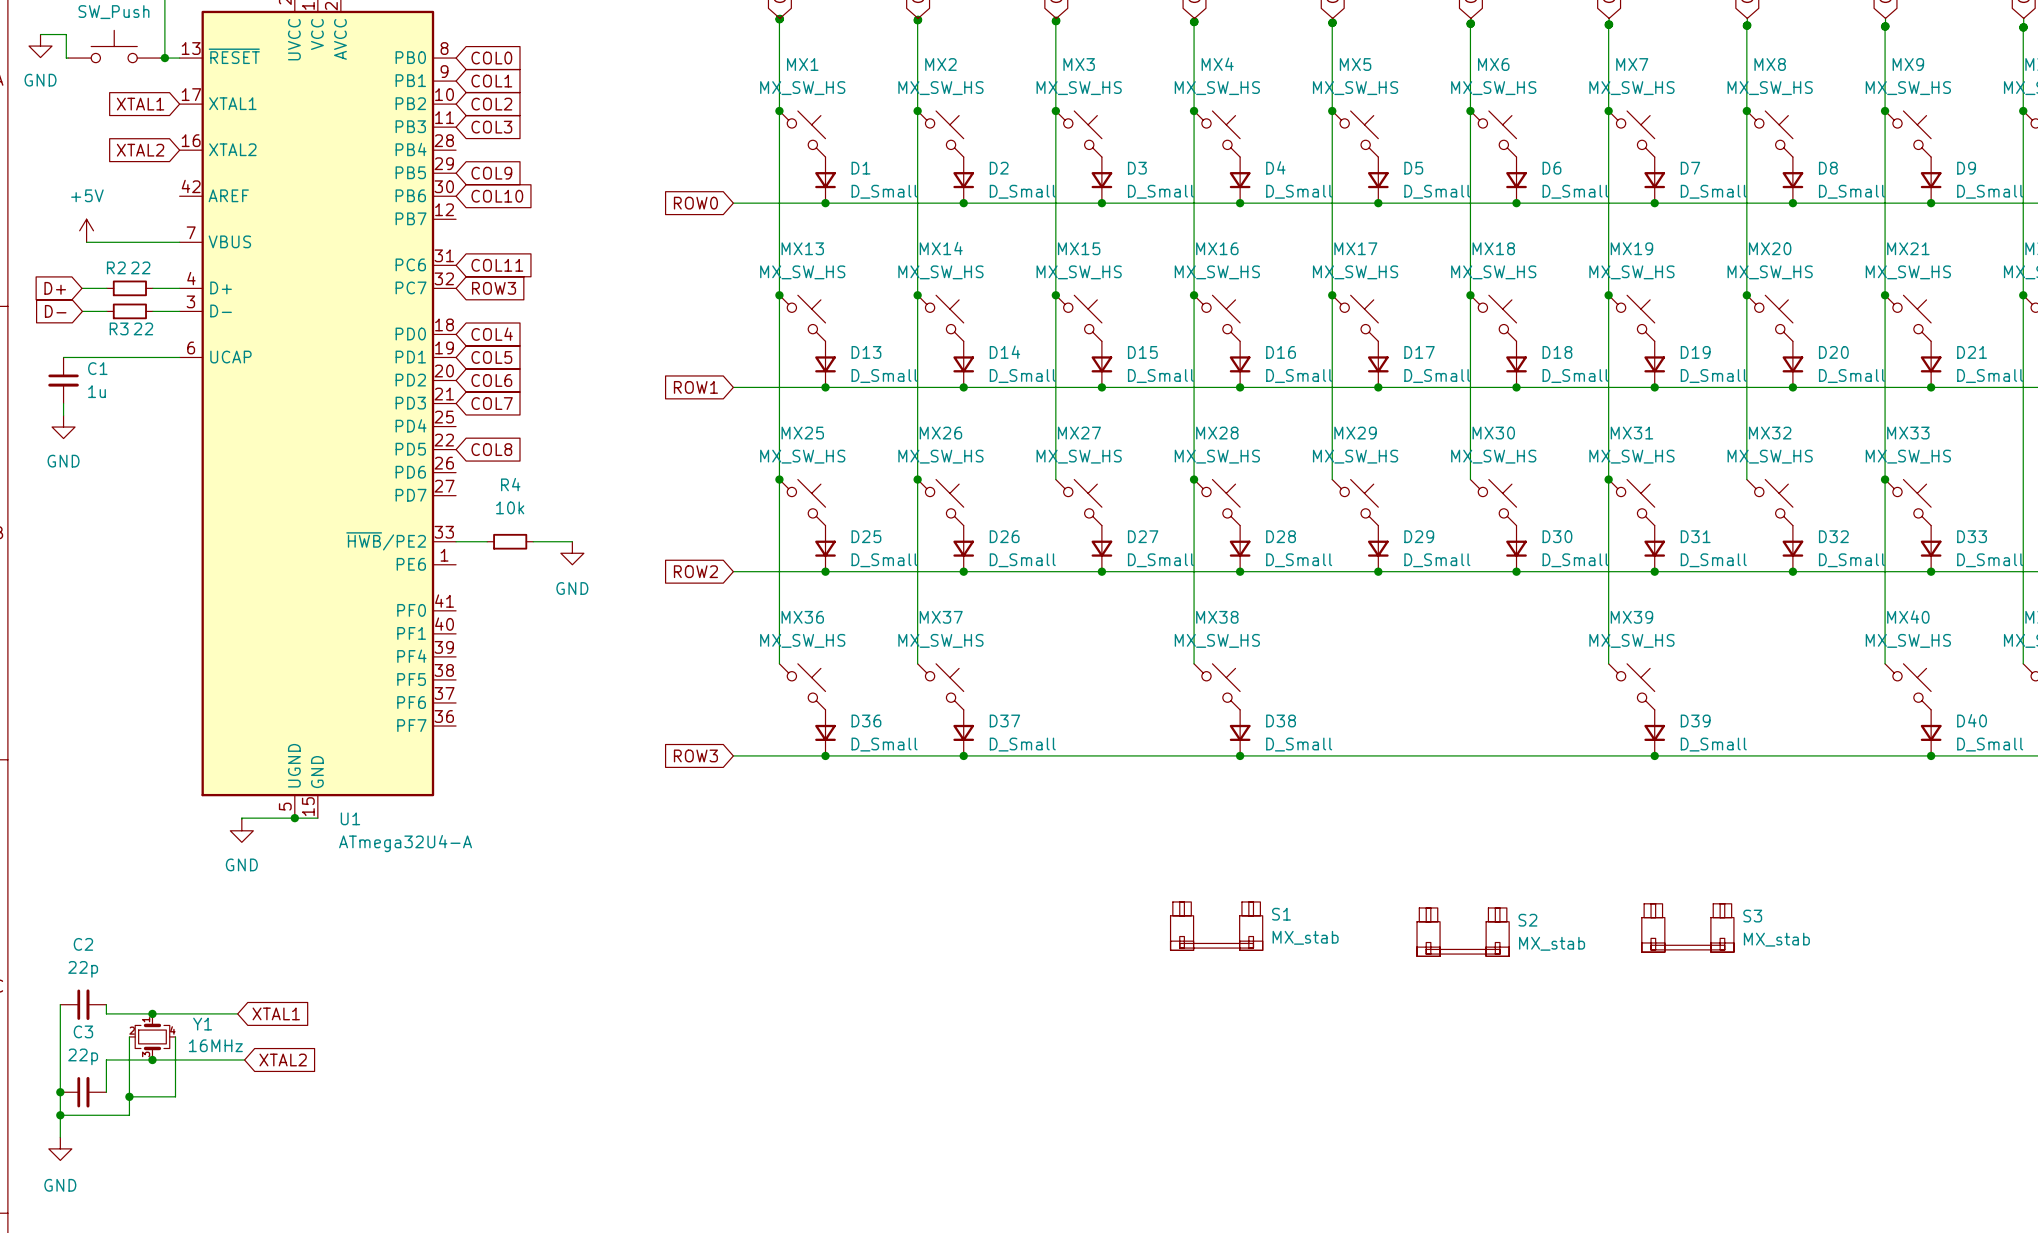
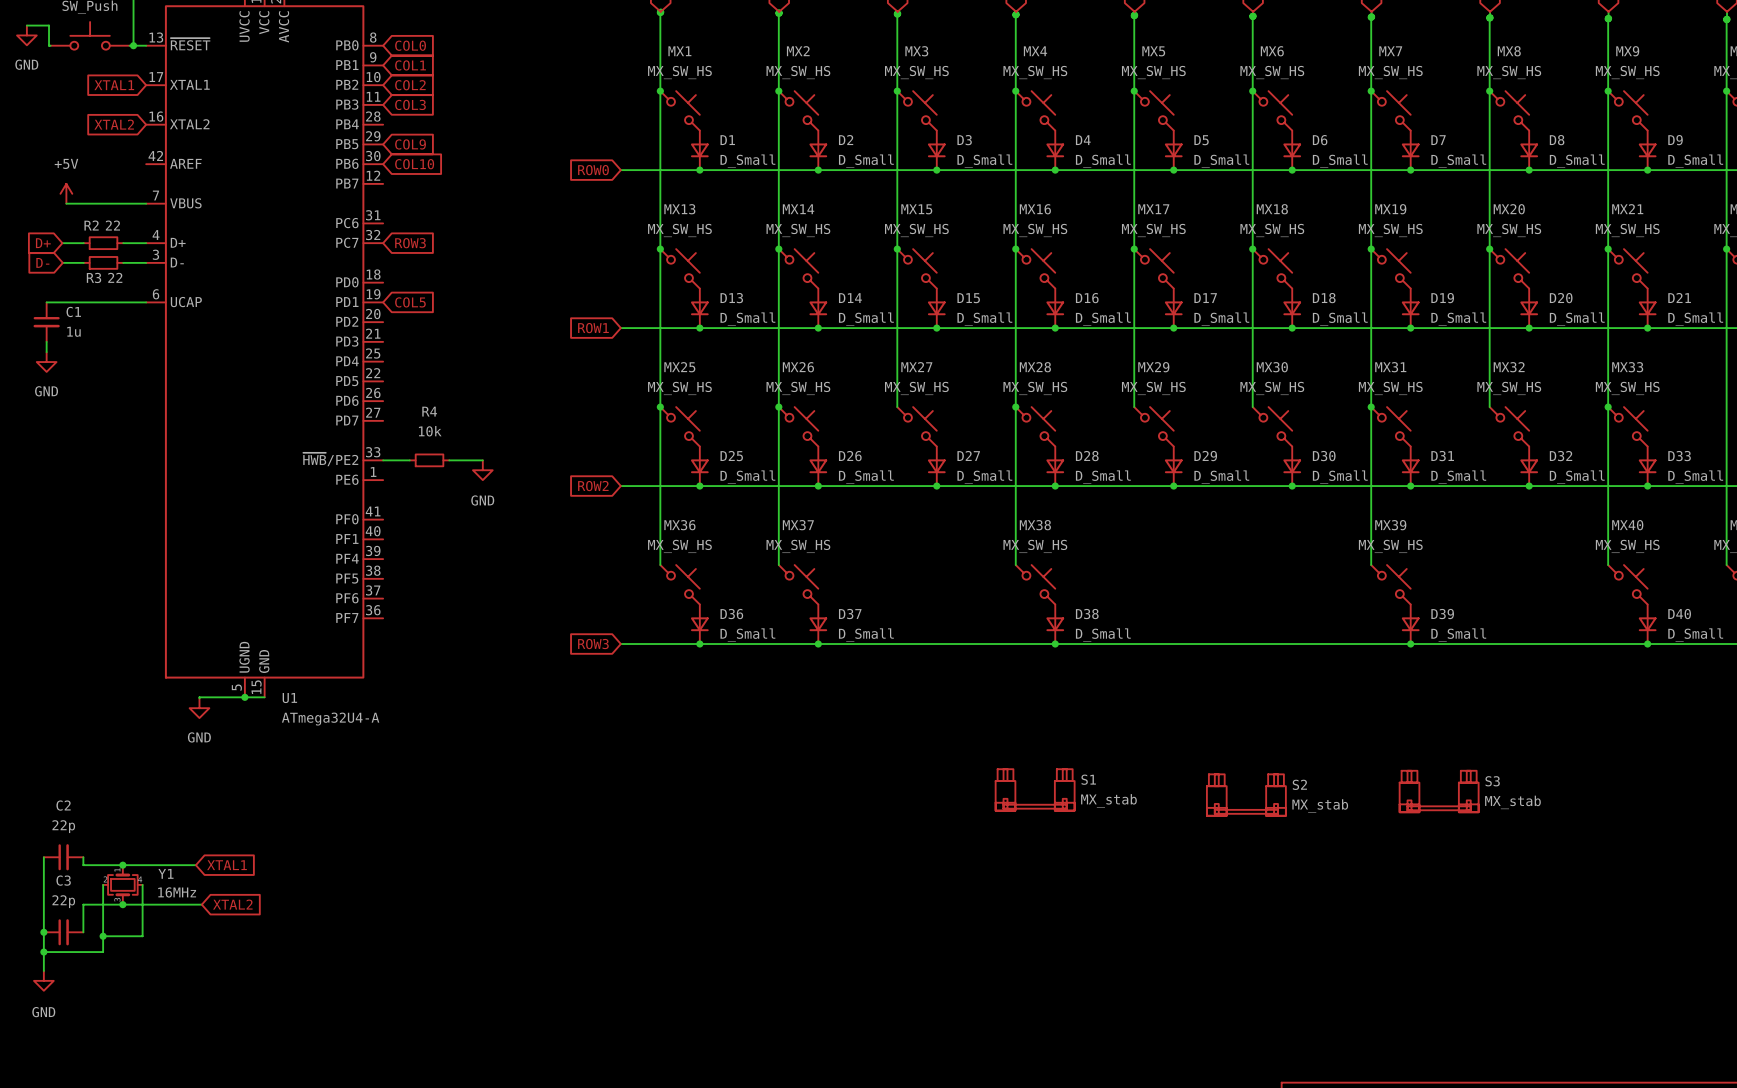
global label: COL11 (497, 265) -> none
global label: COL4 (492, 334) -> none
global label: COL6 (491, 380) -> none
global label: COL7 (492, 403) -> none
global label: COL8 (491, 449) -> none

